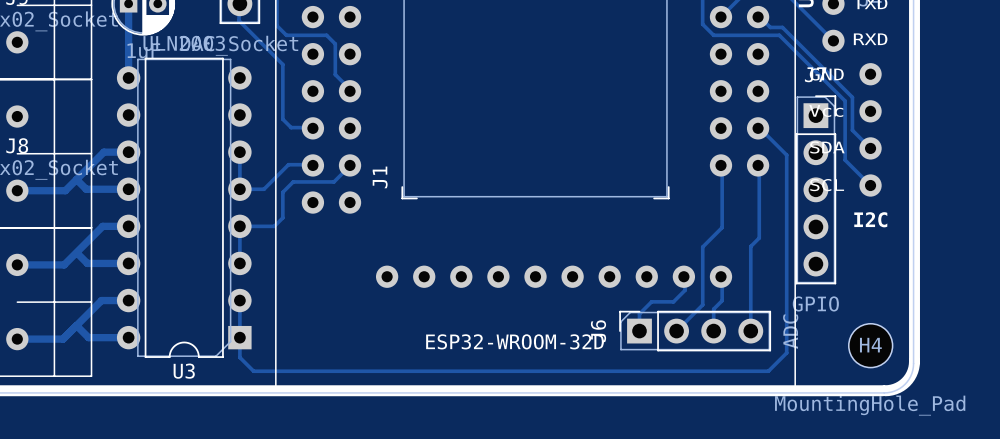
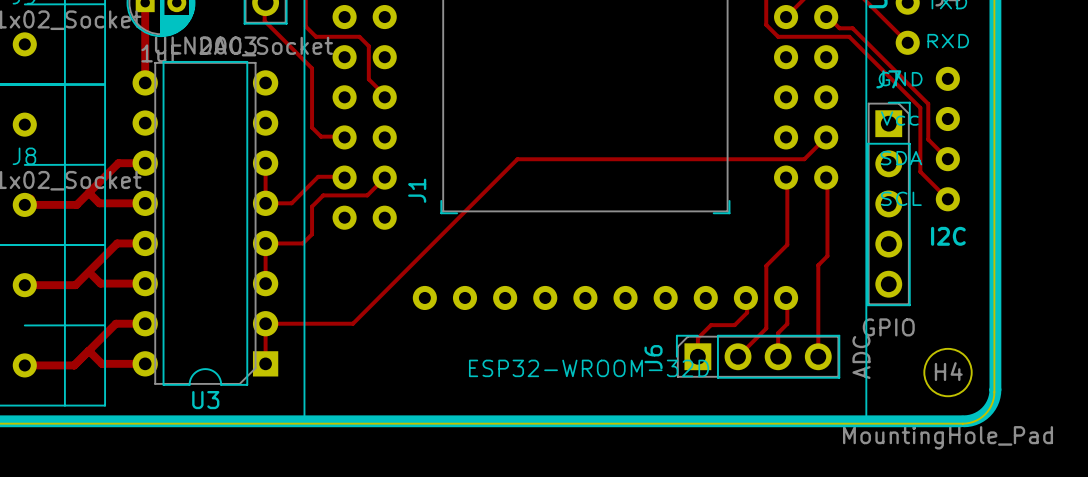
track: (759, 127) (786, 155) (786, 352) (768, 371) (253, 371) (239, 357) (239, 337) -> none
track: none -> (826, 137) (804, 159) (517, 159) (352, 323) (265, 323)

